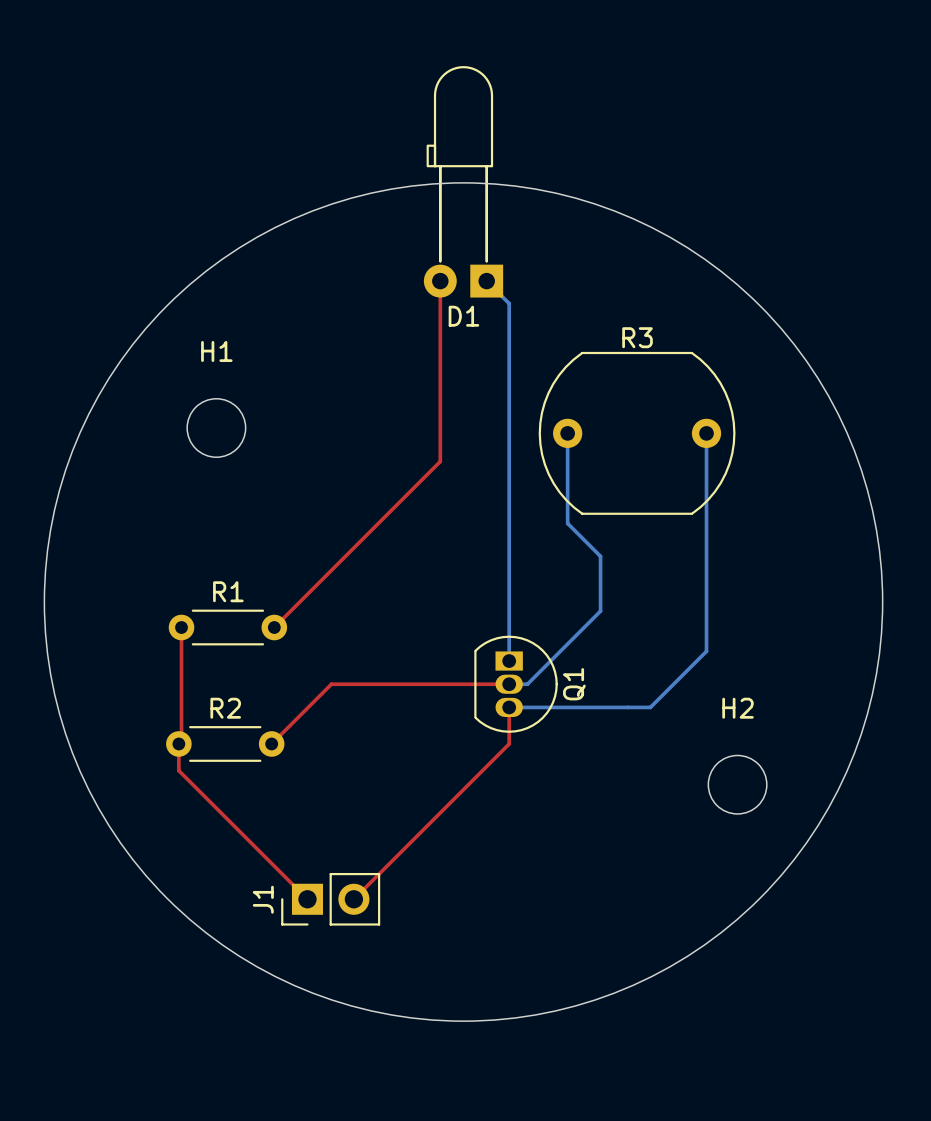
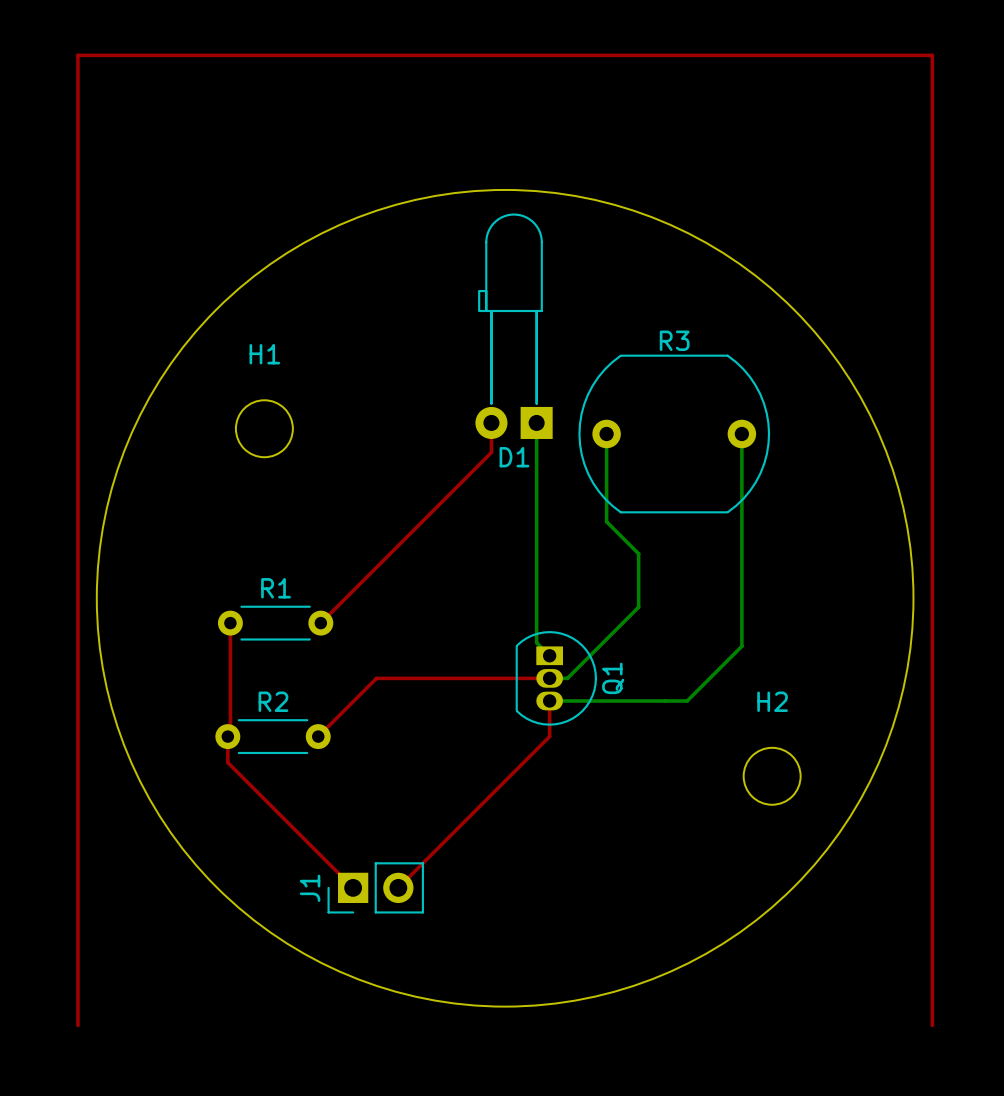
D1 position: (463, 181) -> (514, 326)
top track: (440, 281) (440, 461) -> (491, 422) (491, 452) (482, 461)
bottom track: (486, 281) (509, 303) (509, 661) -> (536, 422) (536, 642) (549, 655)
top track: none -> (77, 1025) (77, 55) (932, 55) (932, 1025)

